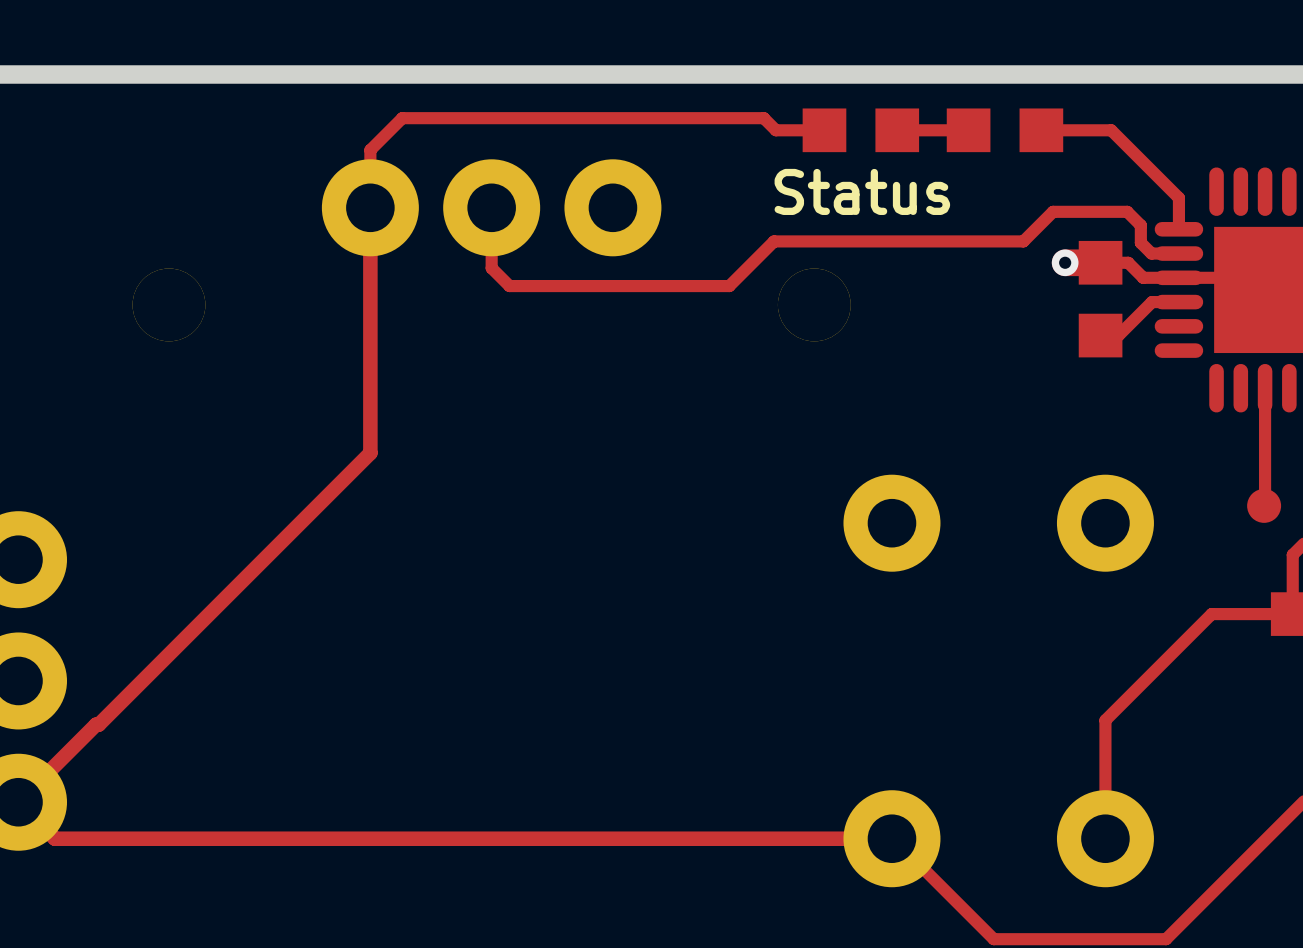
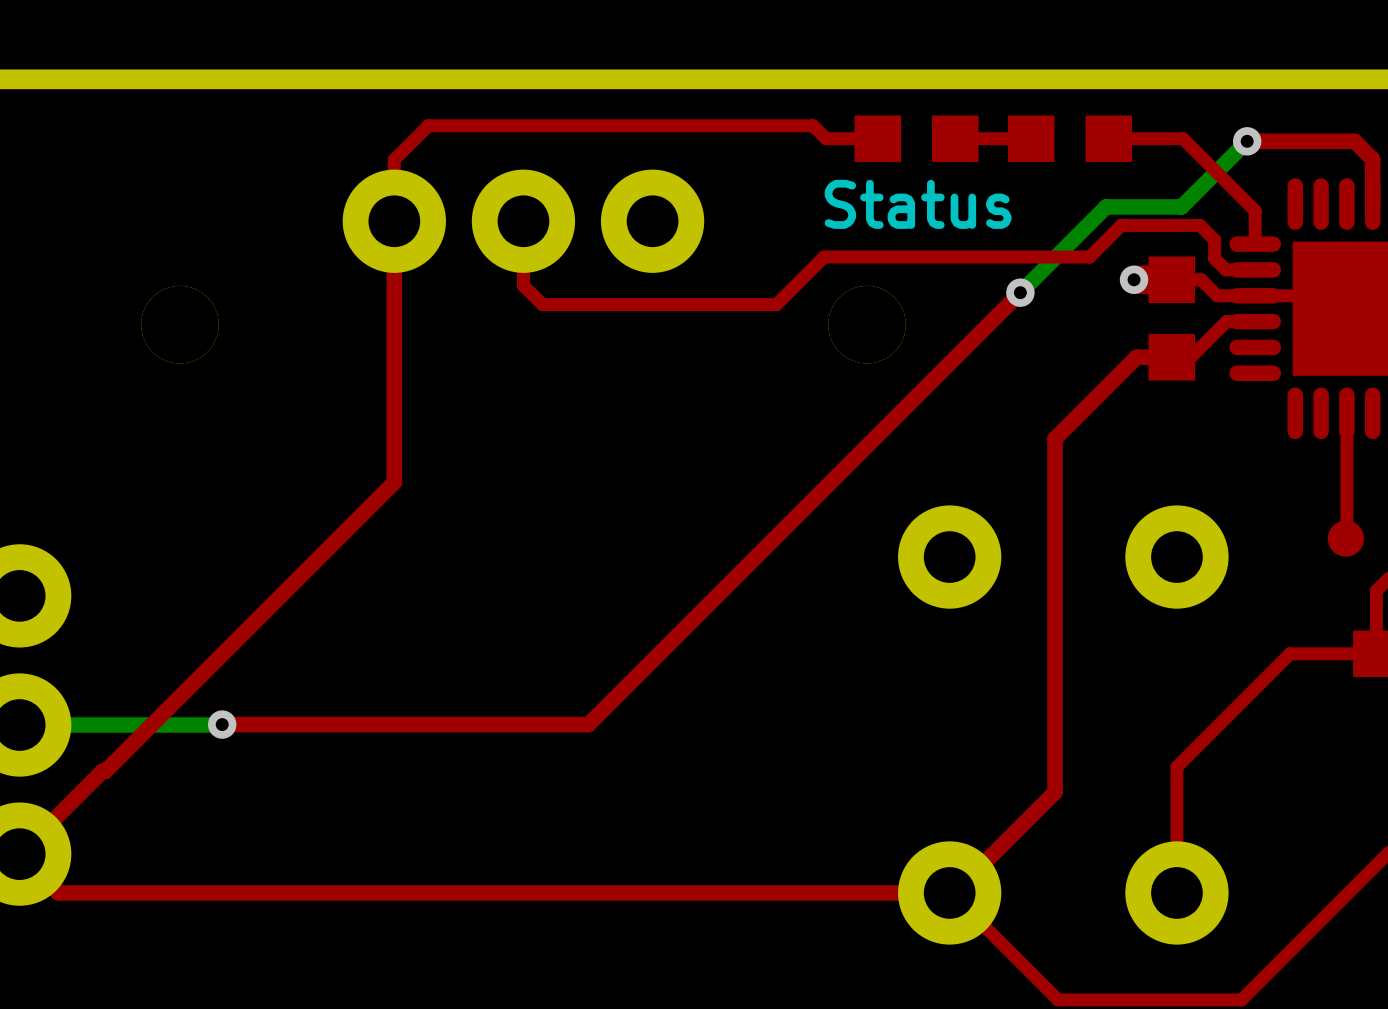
top track: none -> (1247, 141) (1354, 141) (1372, 159) (1372, 204)
bottom track: none -> (1247, 141) (1181, 206) (1106, 206) (1020, 292)
via: none -> (1247, 141)
top track: none -> (1020, 292) (588, 724) (222, 724)
via: none -> (1020, 292)
top track: none -> (1171, 357) (1136, 357) (1055, 438) (1055, 792) (954, 892) (951, 892)
bottom track: none -> (19, 725) (221, 725)
via: none -> (222, 724)

